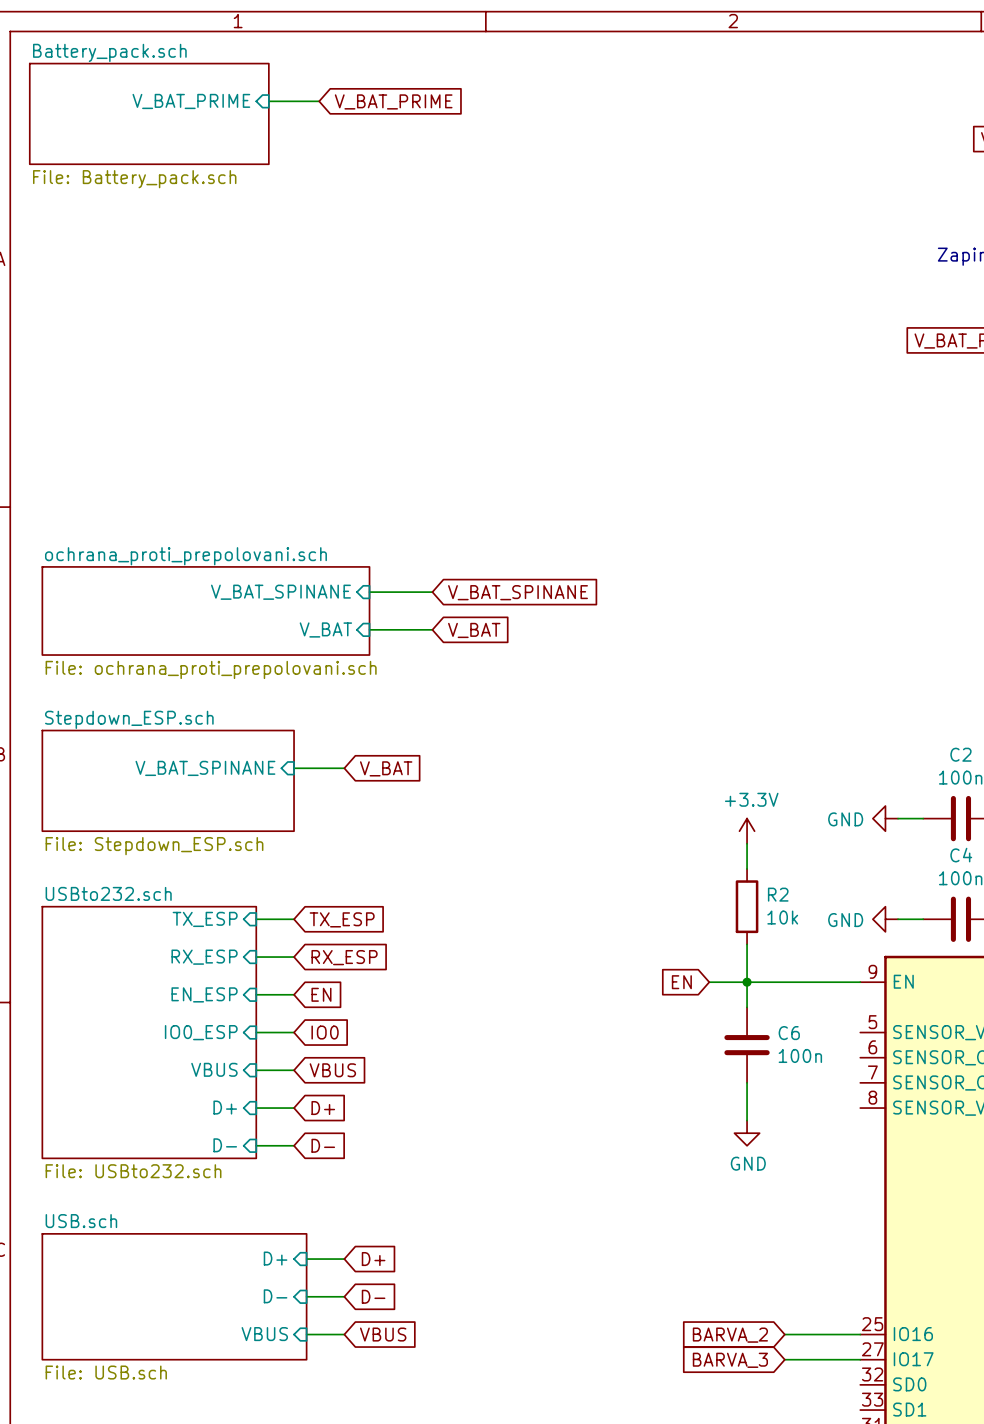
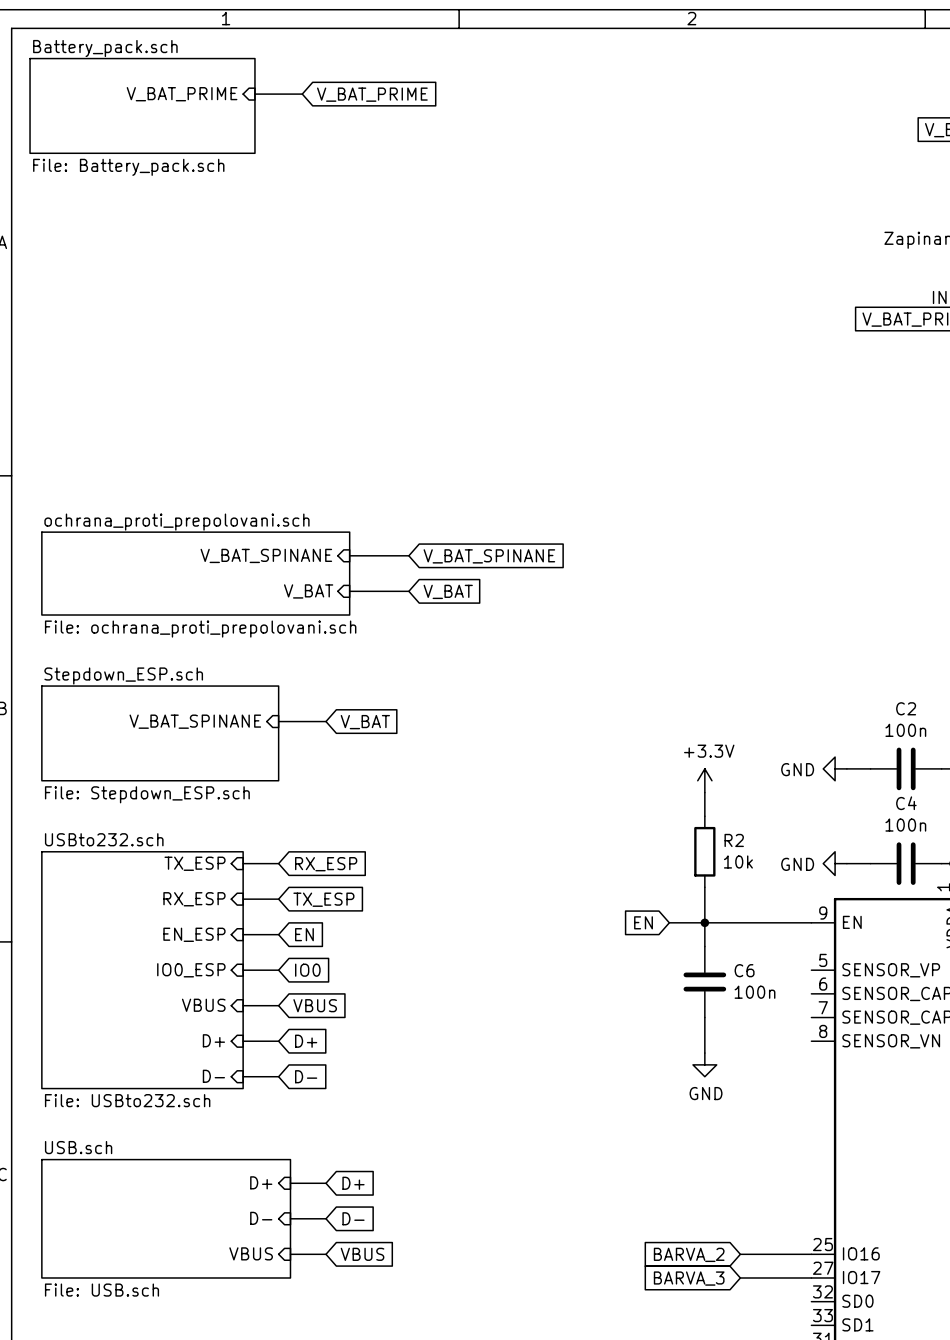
global label: TX_ESP (342, 919) -> RX_ESP (326, 864)
global label: RX_ESP (344, 957) -> TX_ESP (323, 899)

